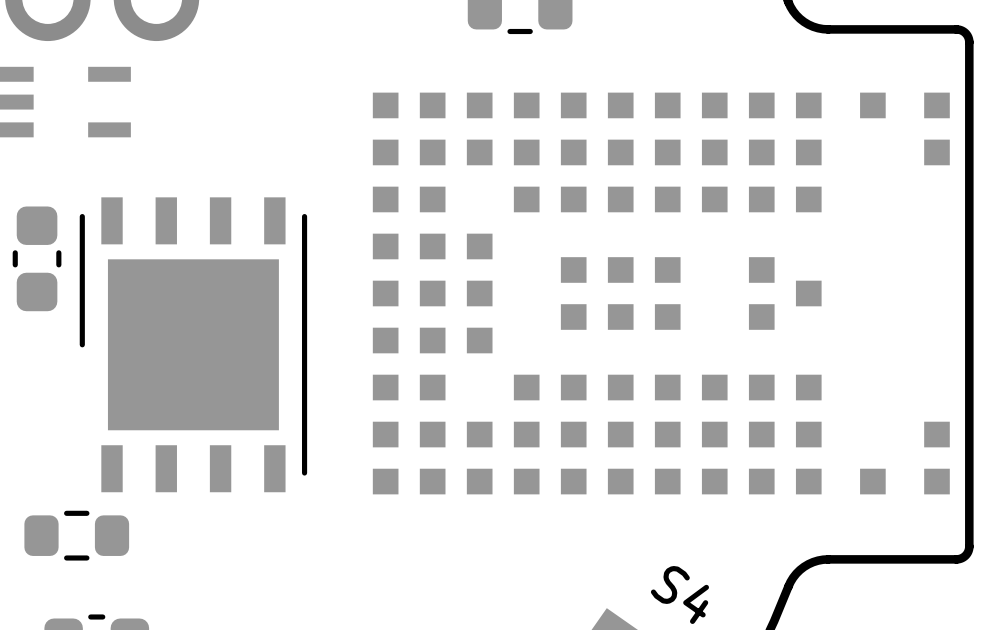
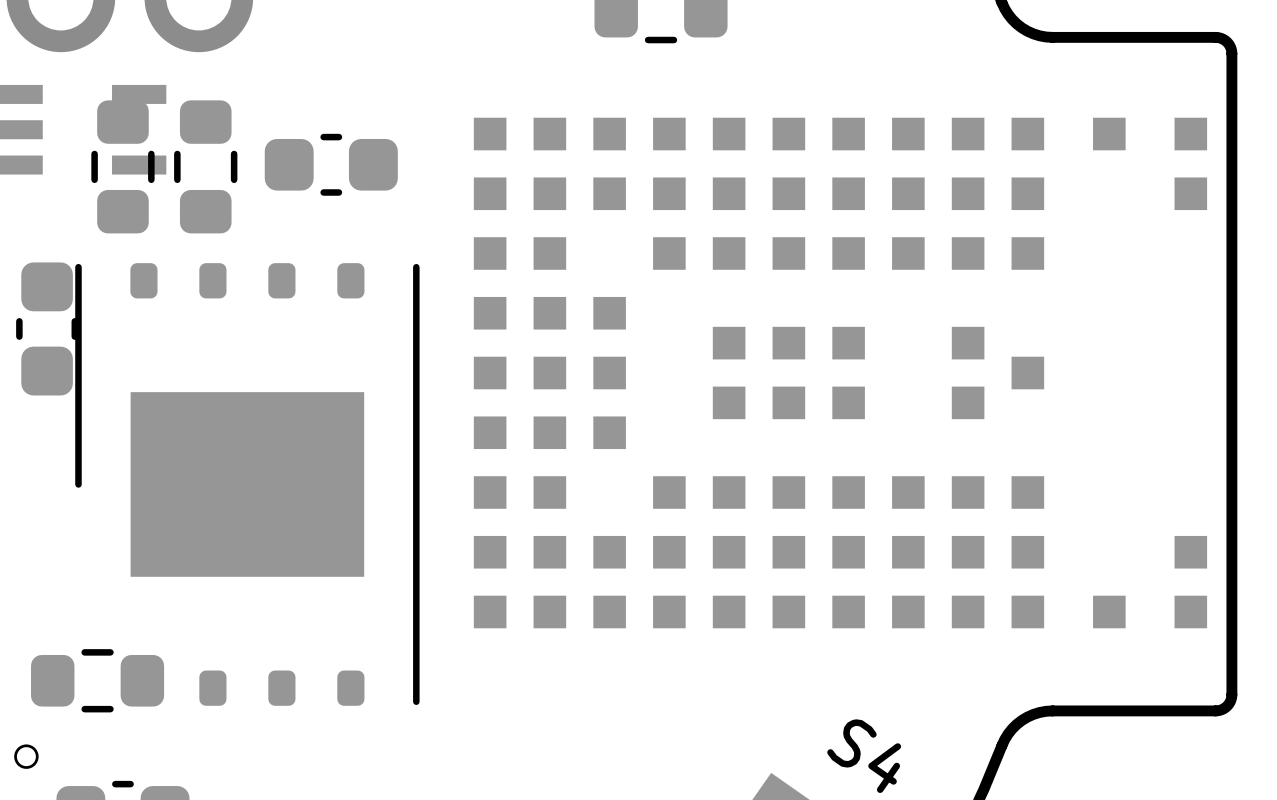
part: none -> (331, 164)
part: none -> (122, 166)
part: none -> (205, 166)
part footprint: [79, 197, 308, 493] -> [75, 263, 420, 706]
round board edge: none -> [14, 744, 39, 769]

